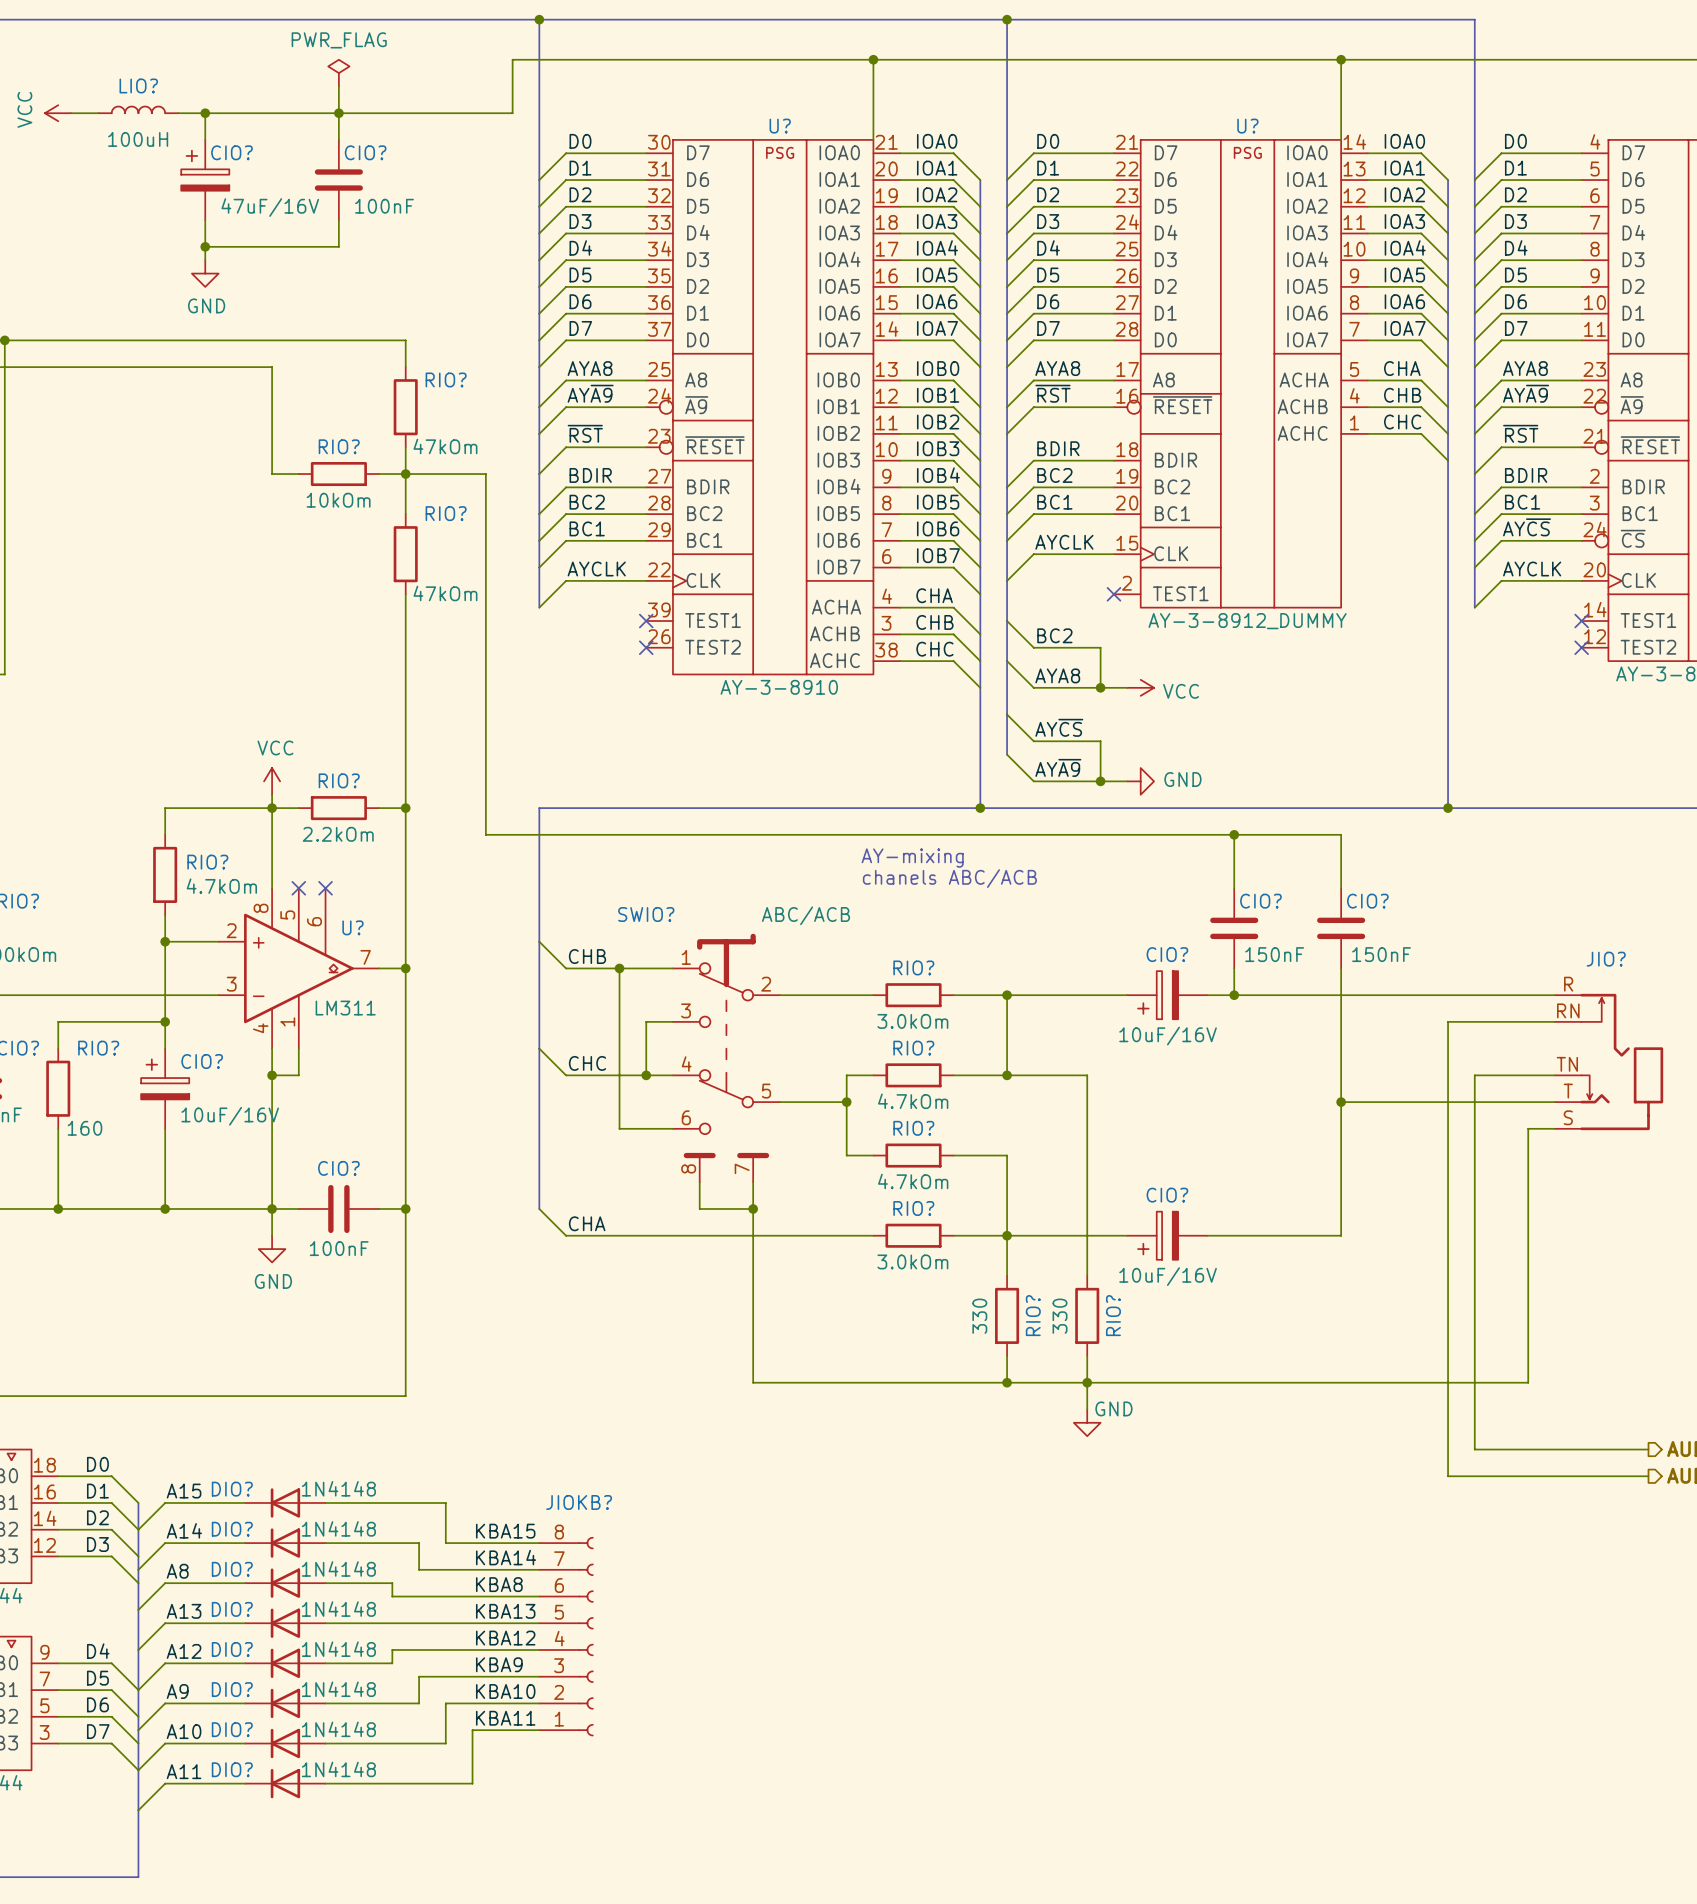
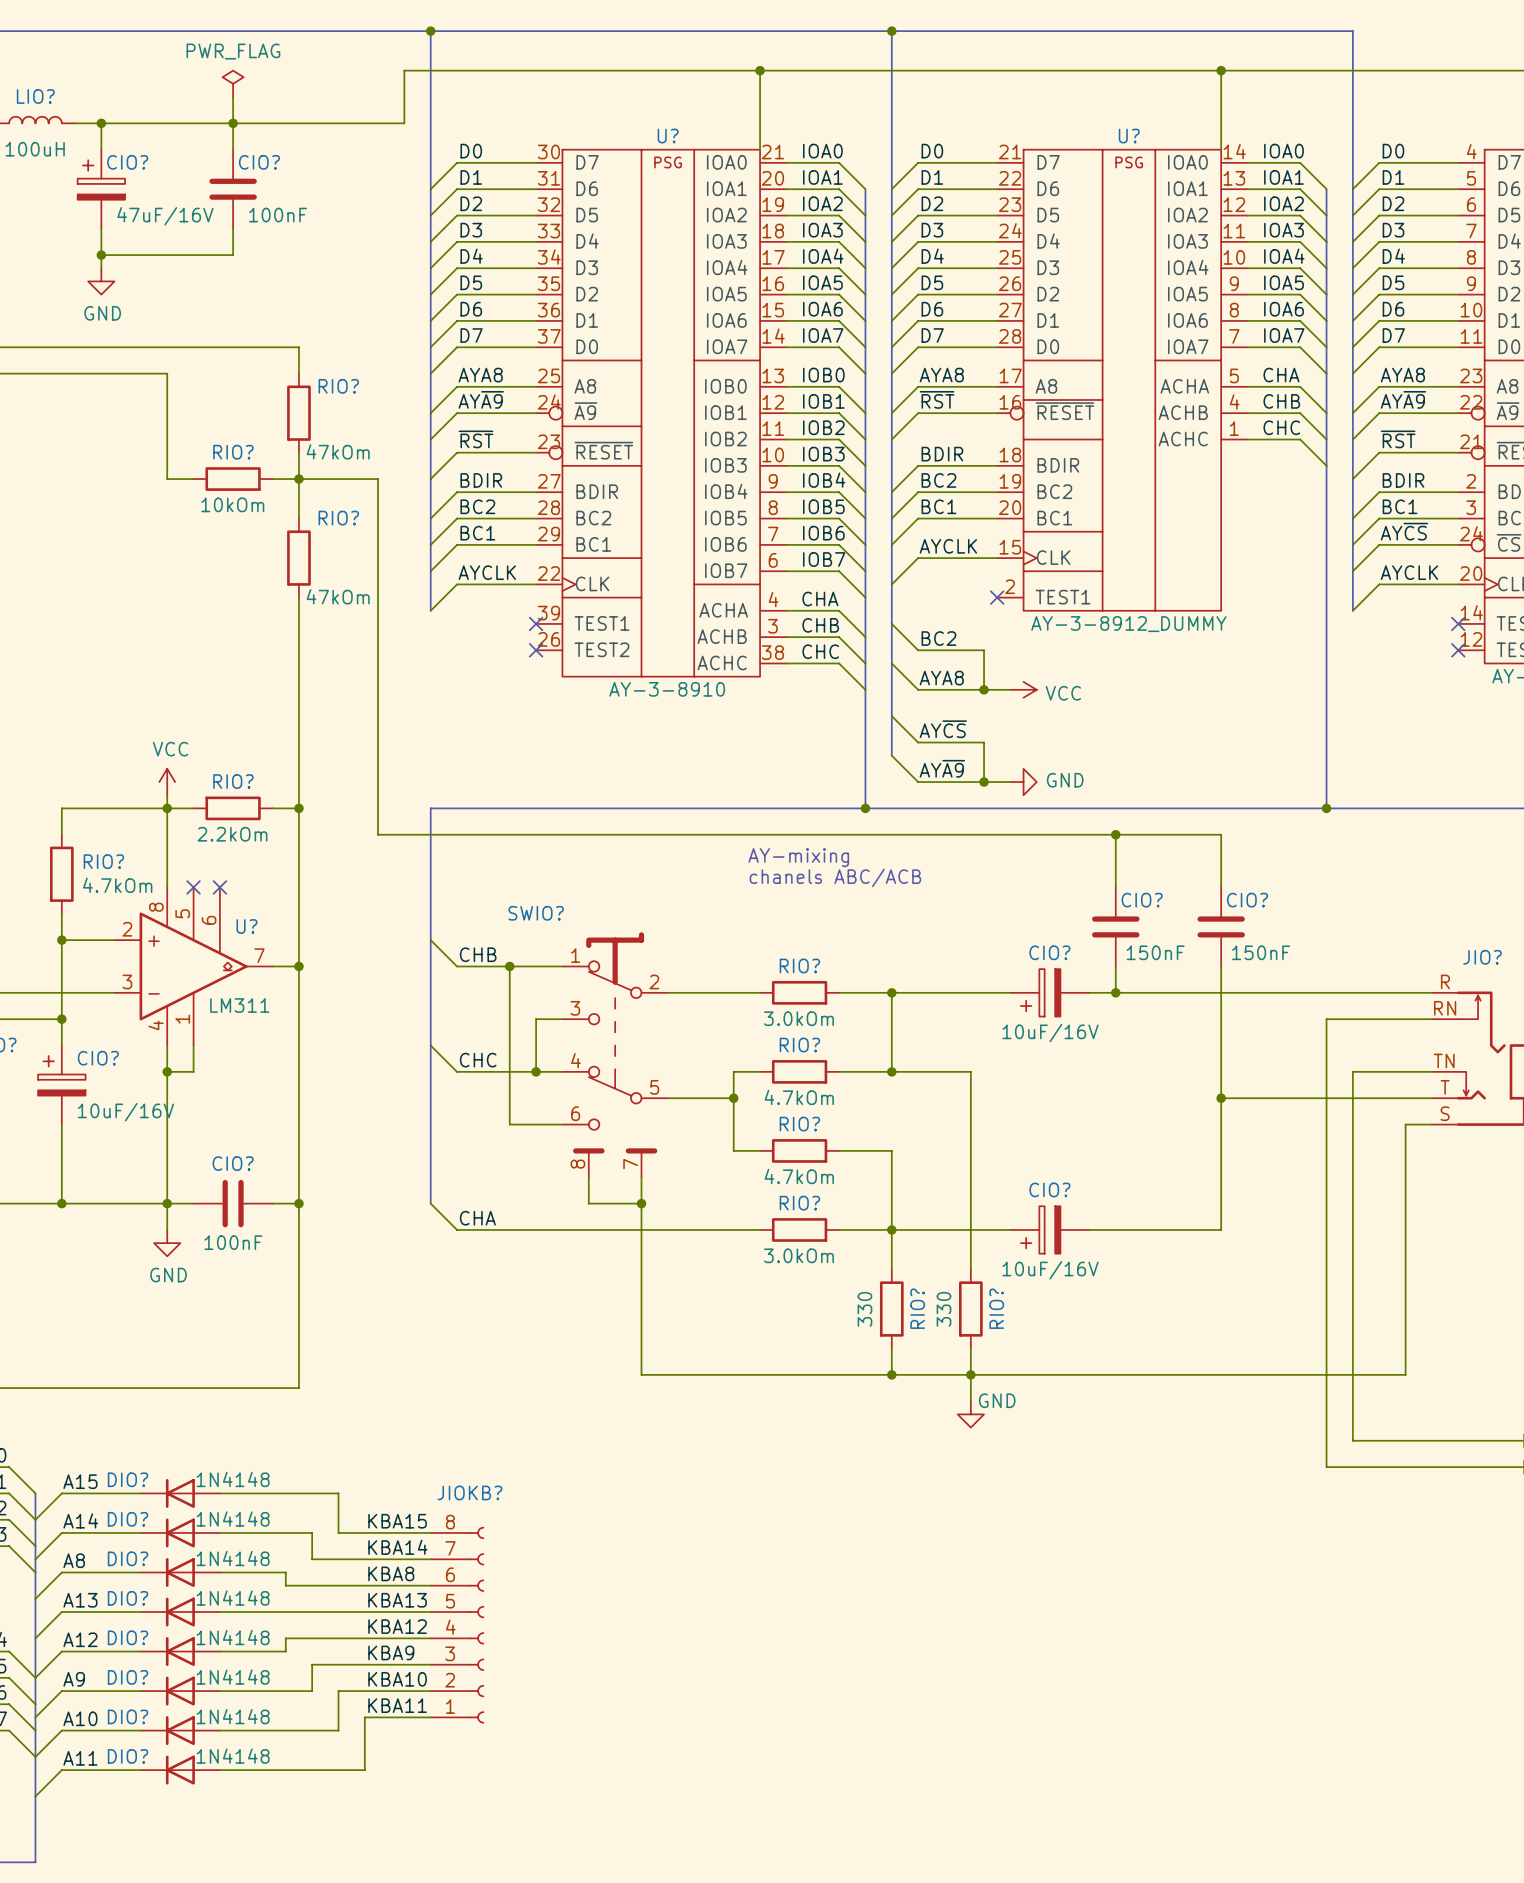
SWIO? value: ABC/ACB (805, 915) -> none

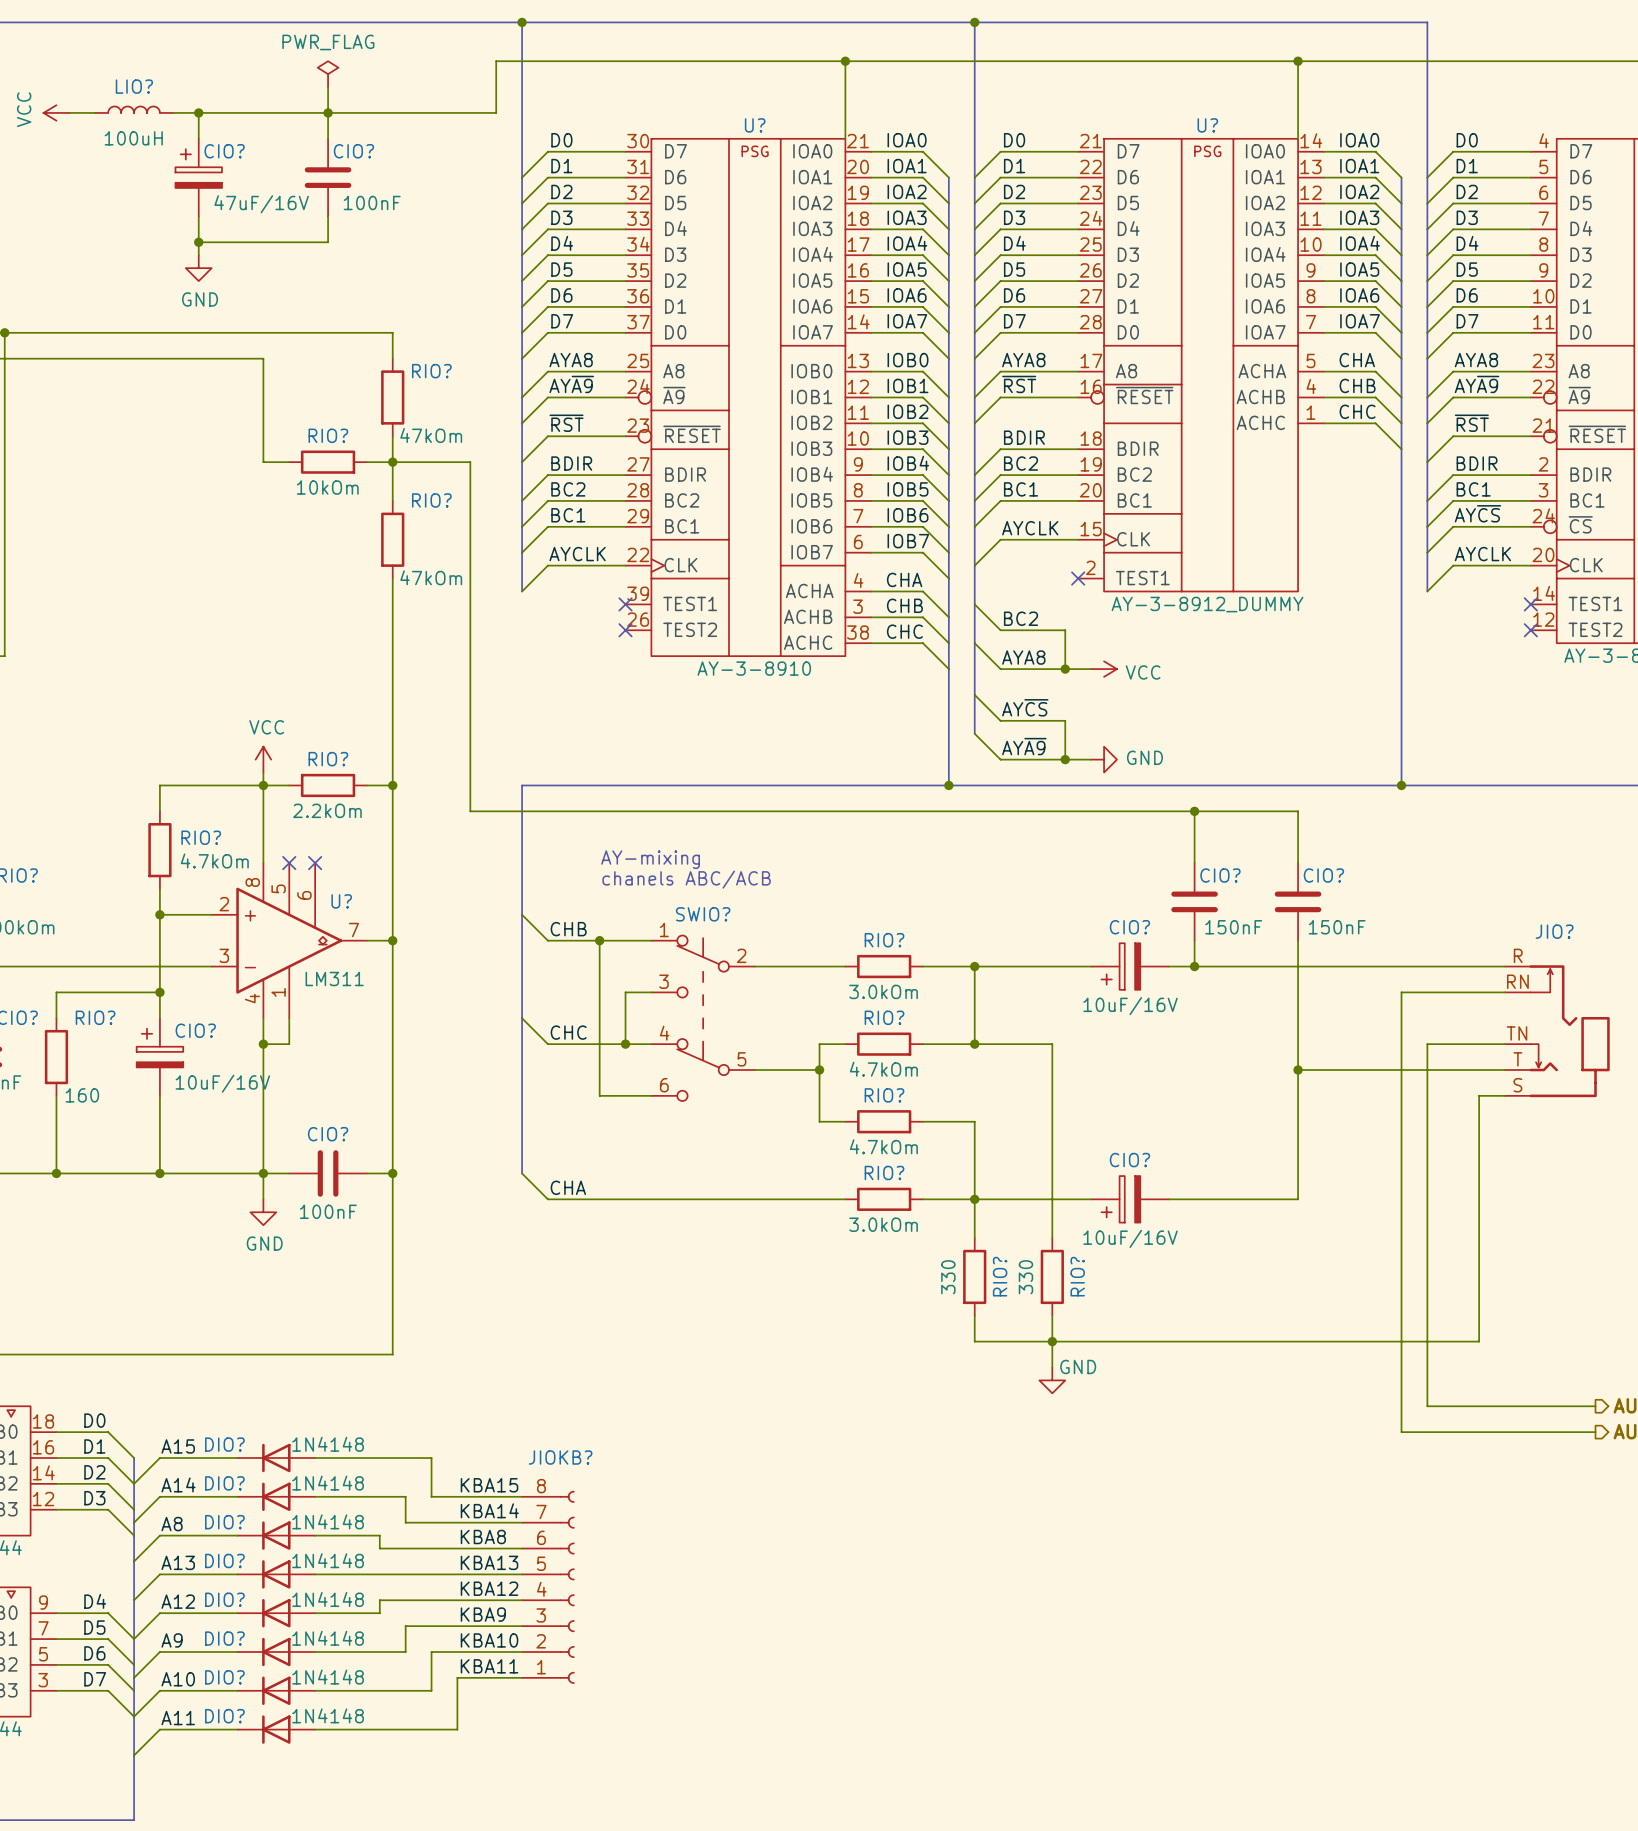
text position: AY-mixing (798, 857) -> AY-mixing (650, 859)
text position: chanels ABC/ACB (835, 877) -> chanels ABC/ACB (686, 879)
SWIO? name position: SWIO? (536, 913) -> SWIO? (703, 914)
SWIO? symbol: [562, 932, 668, 1178] -> [651, 935, 755, 1102]
wire: (588, 1177) (588, 1203) (641, 1203) -> none
wire: (641, 1177) (641, 1374) (891, 1374) -> none
junction: (641, 1203) -> none
junction: (891, 1374) -> none

